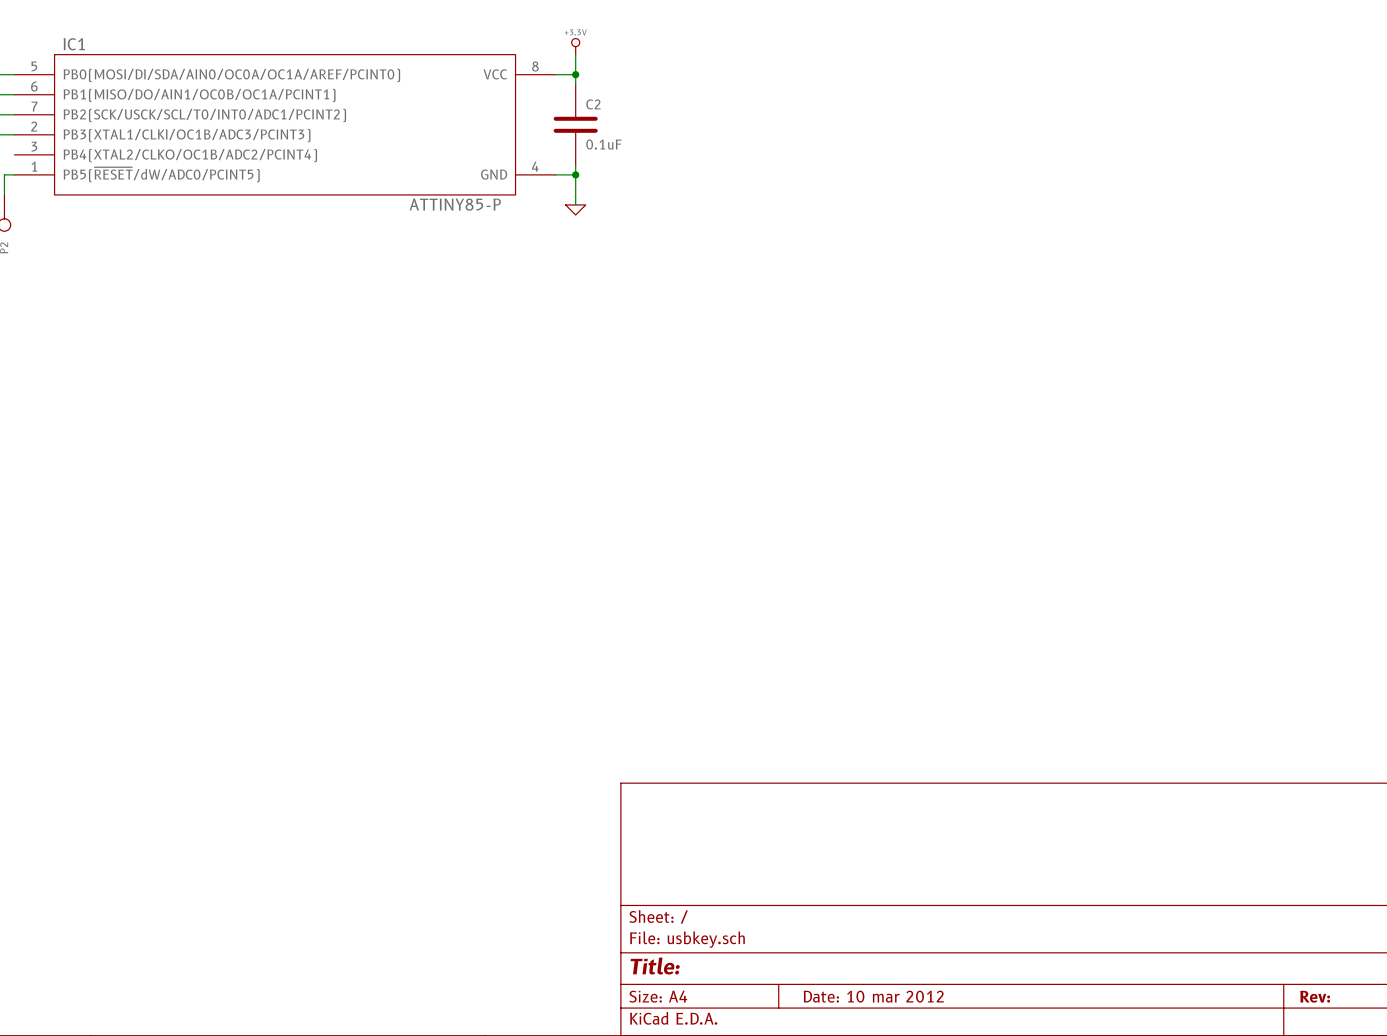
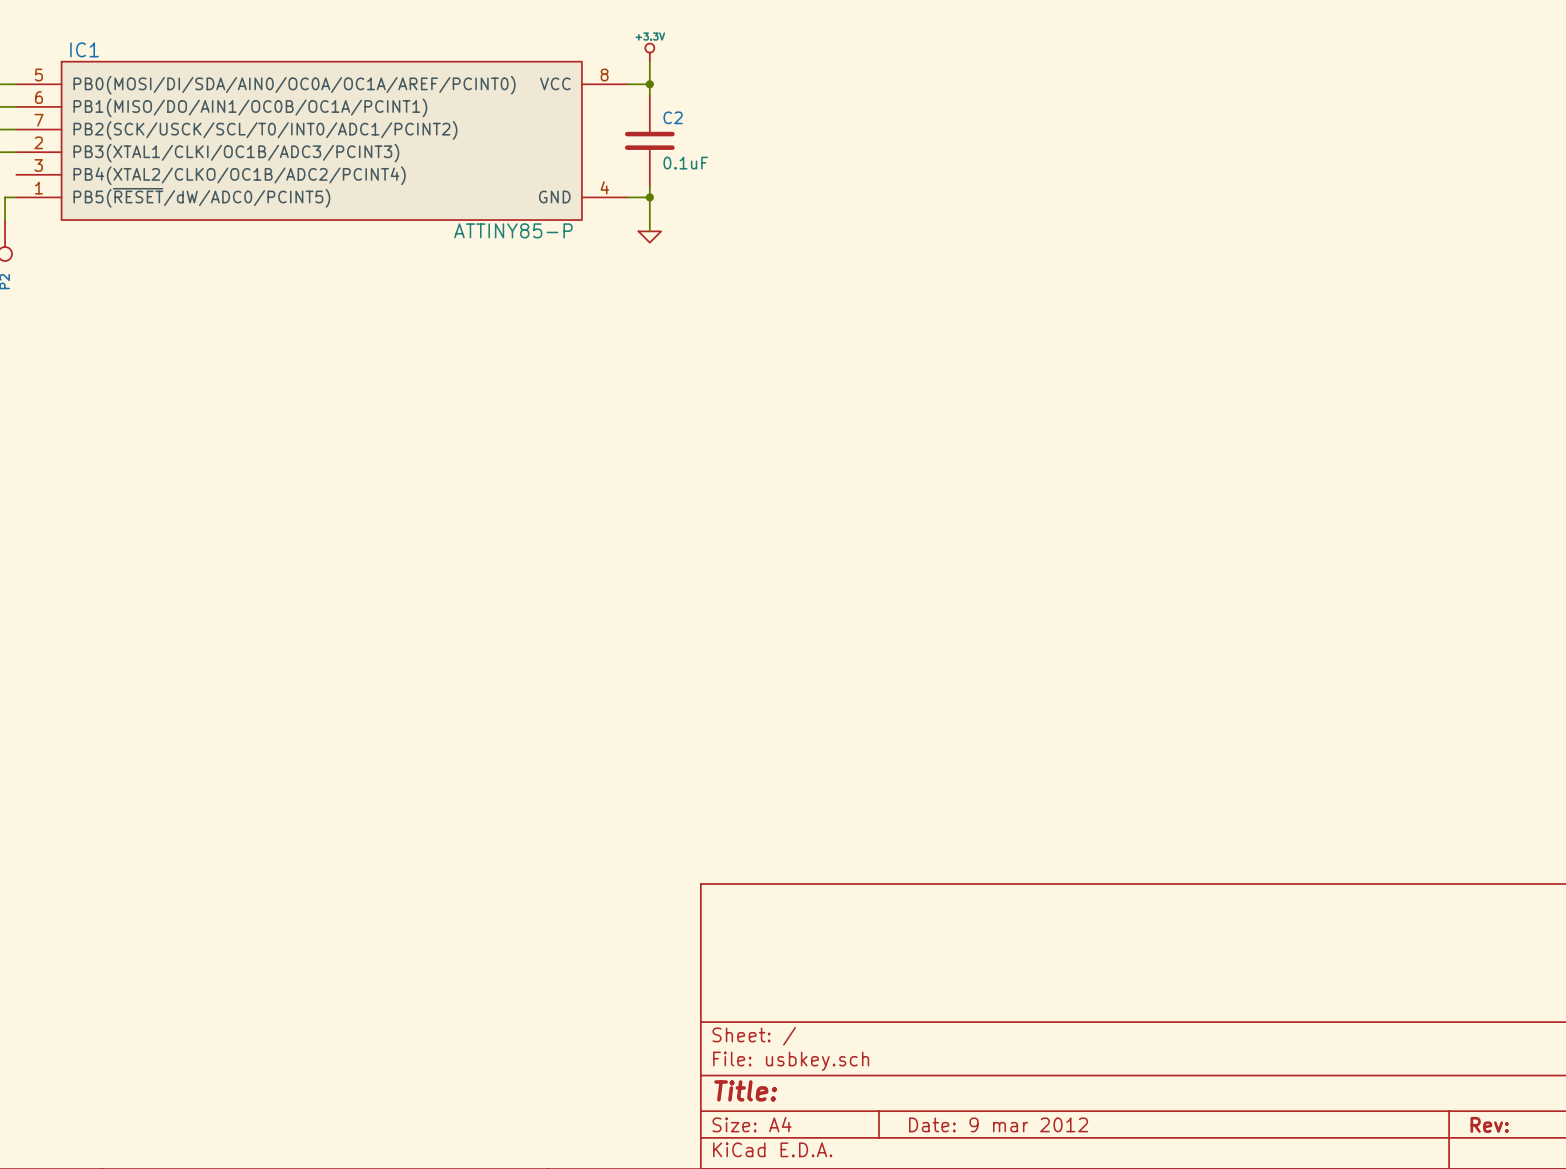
title block: Date: 10 mar 2012 (873, 996) -> Date: 9 mar 2012 (998, 1124)

